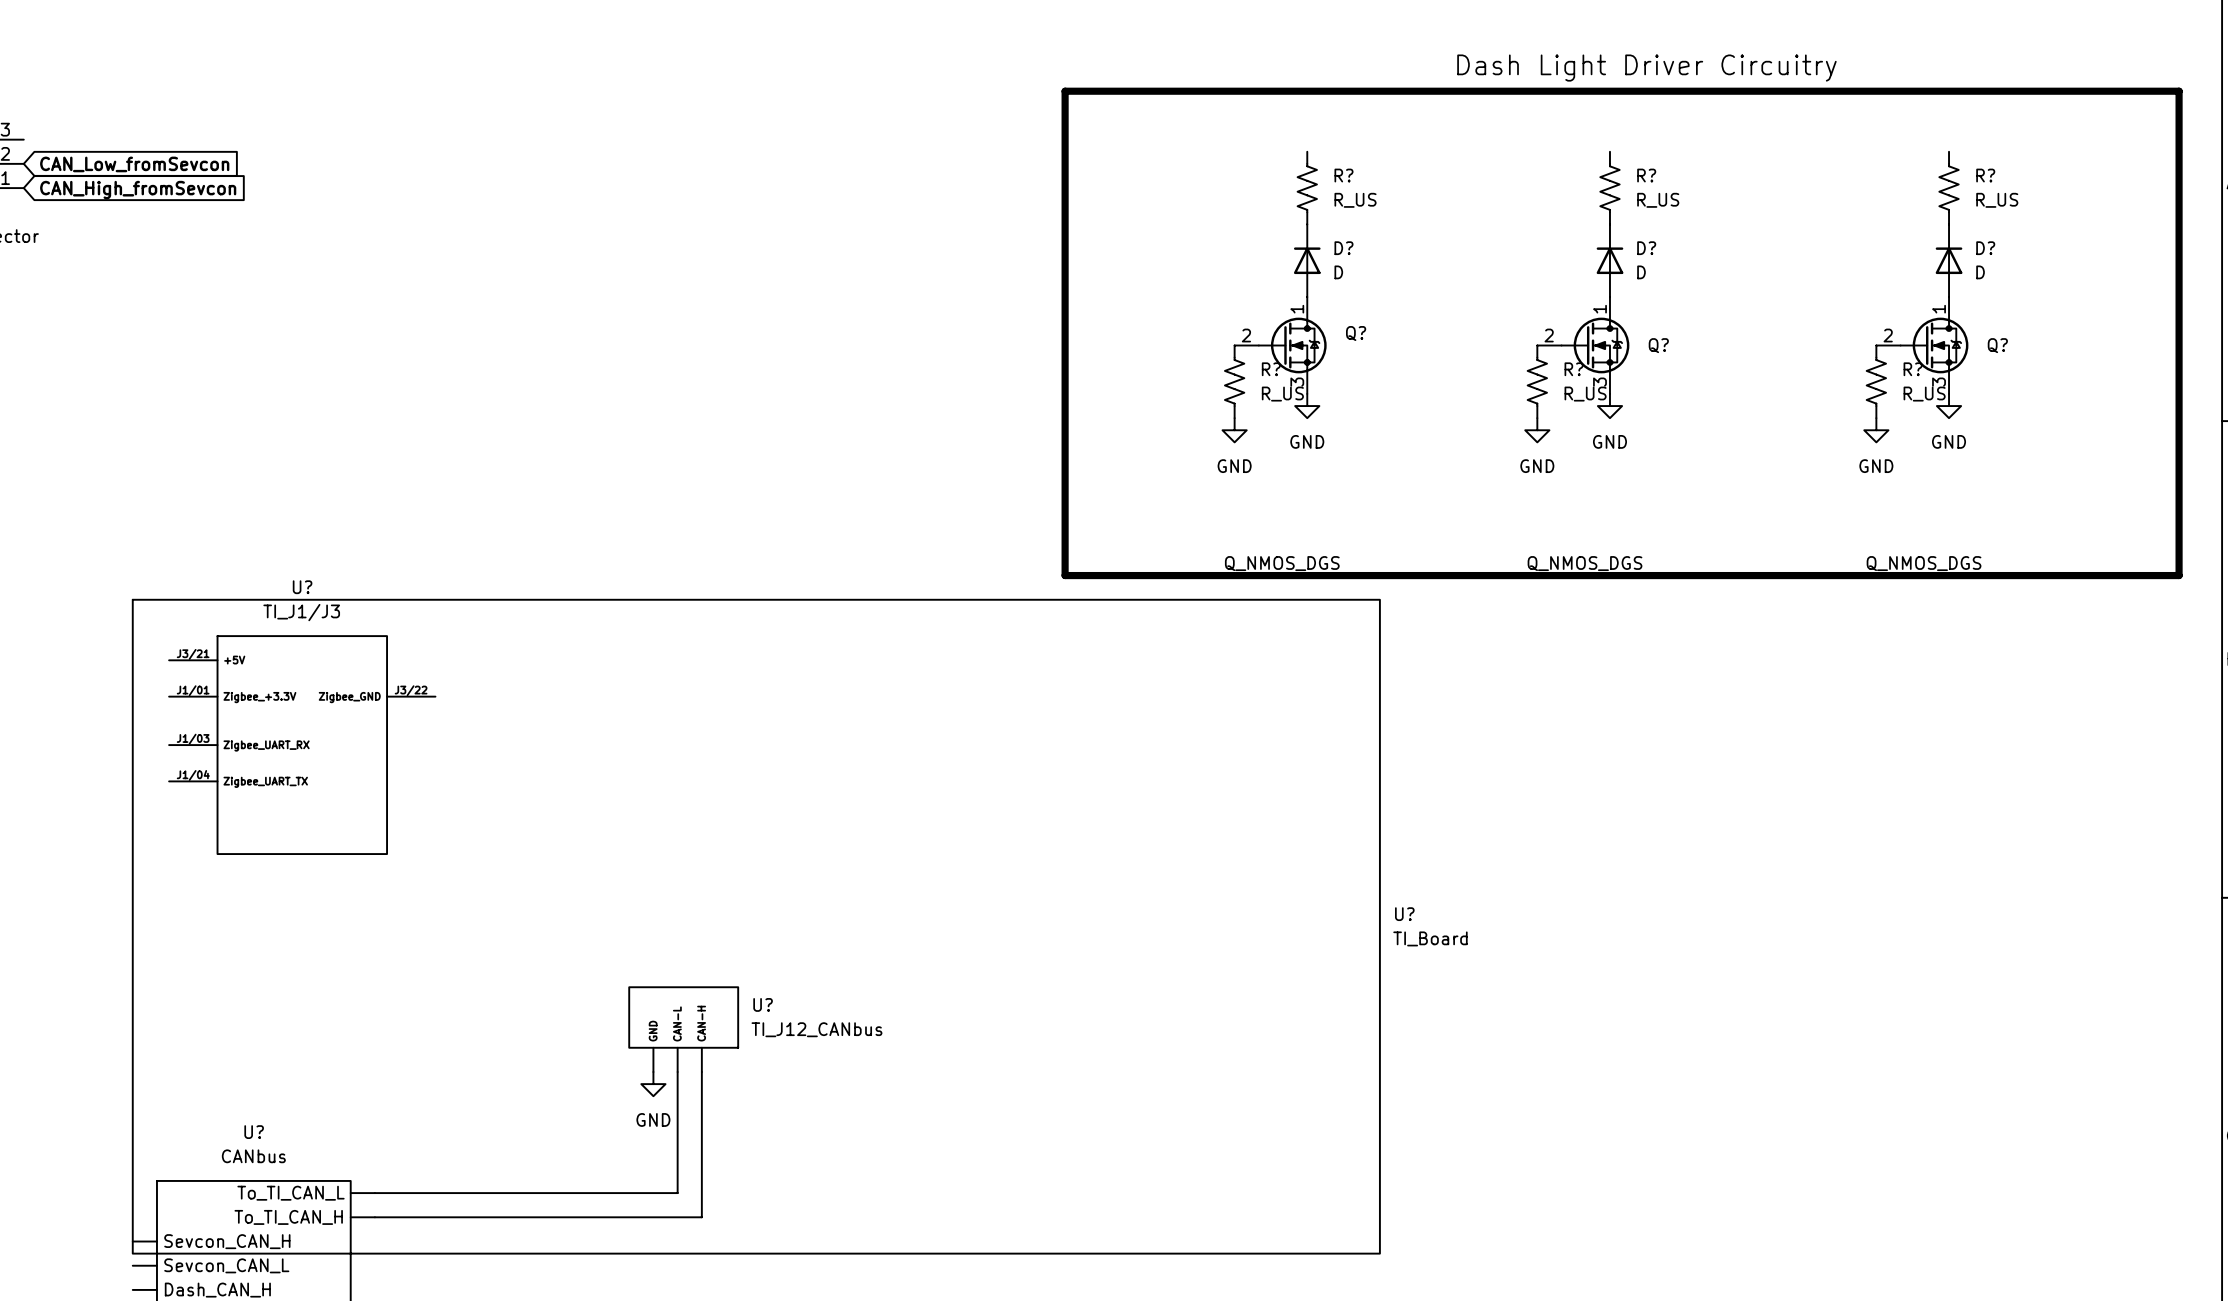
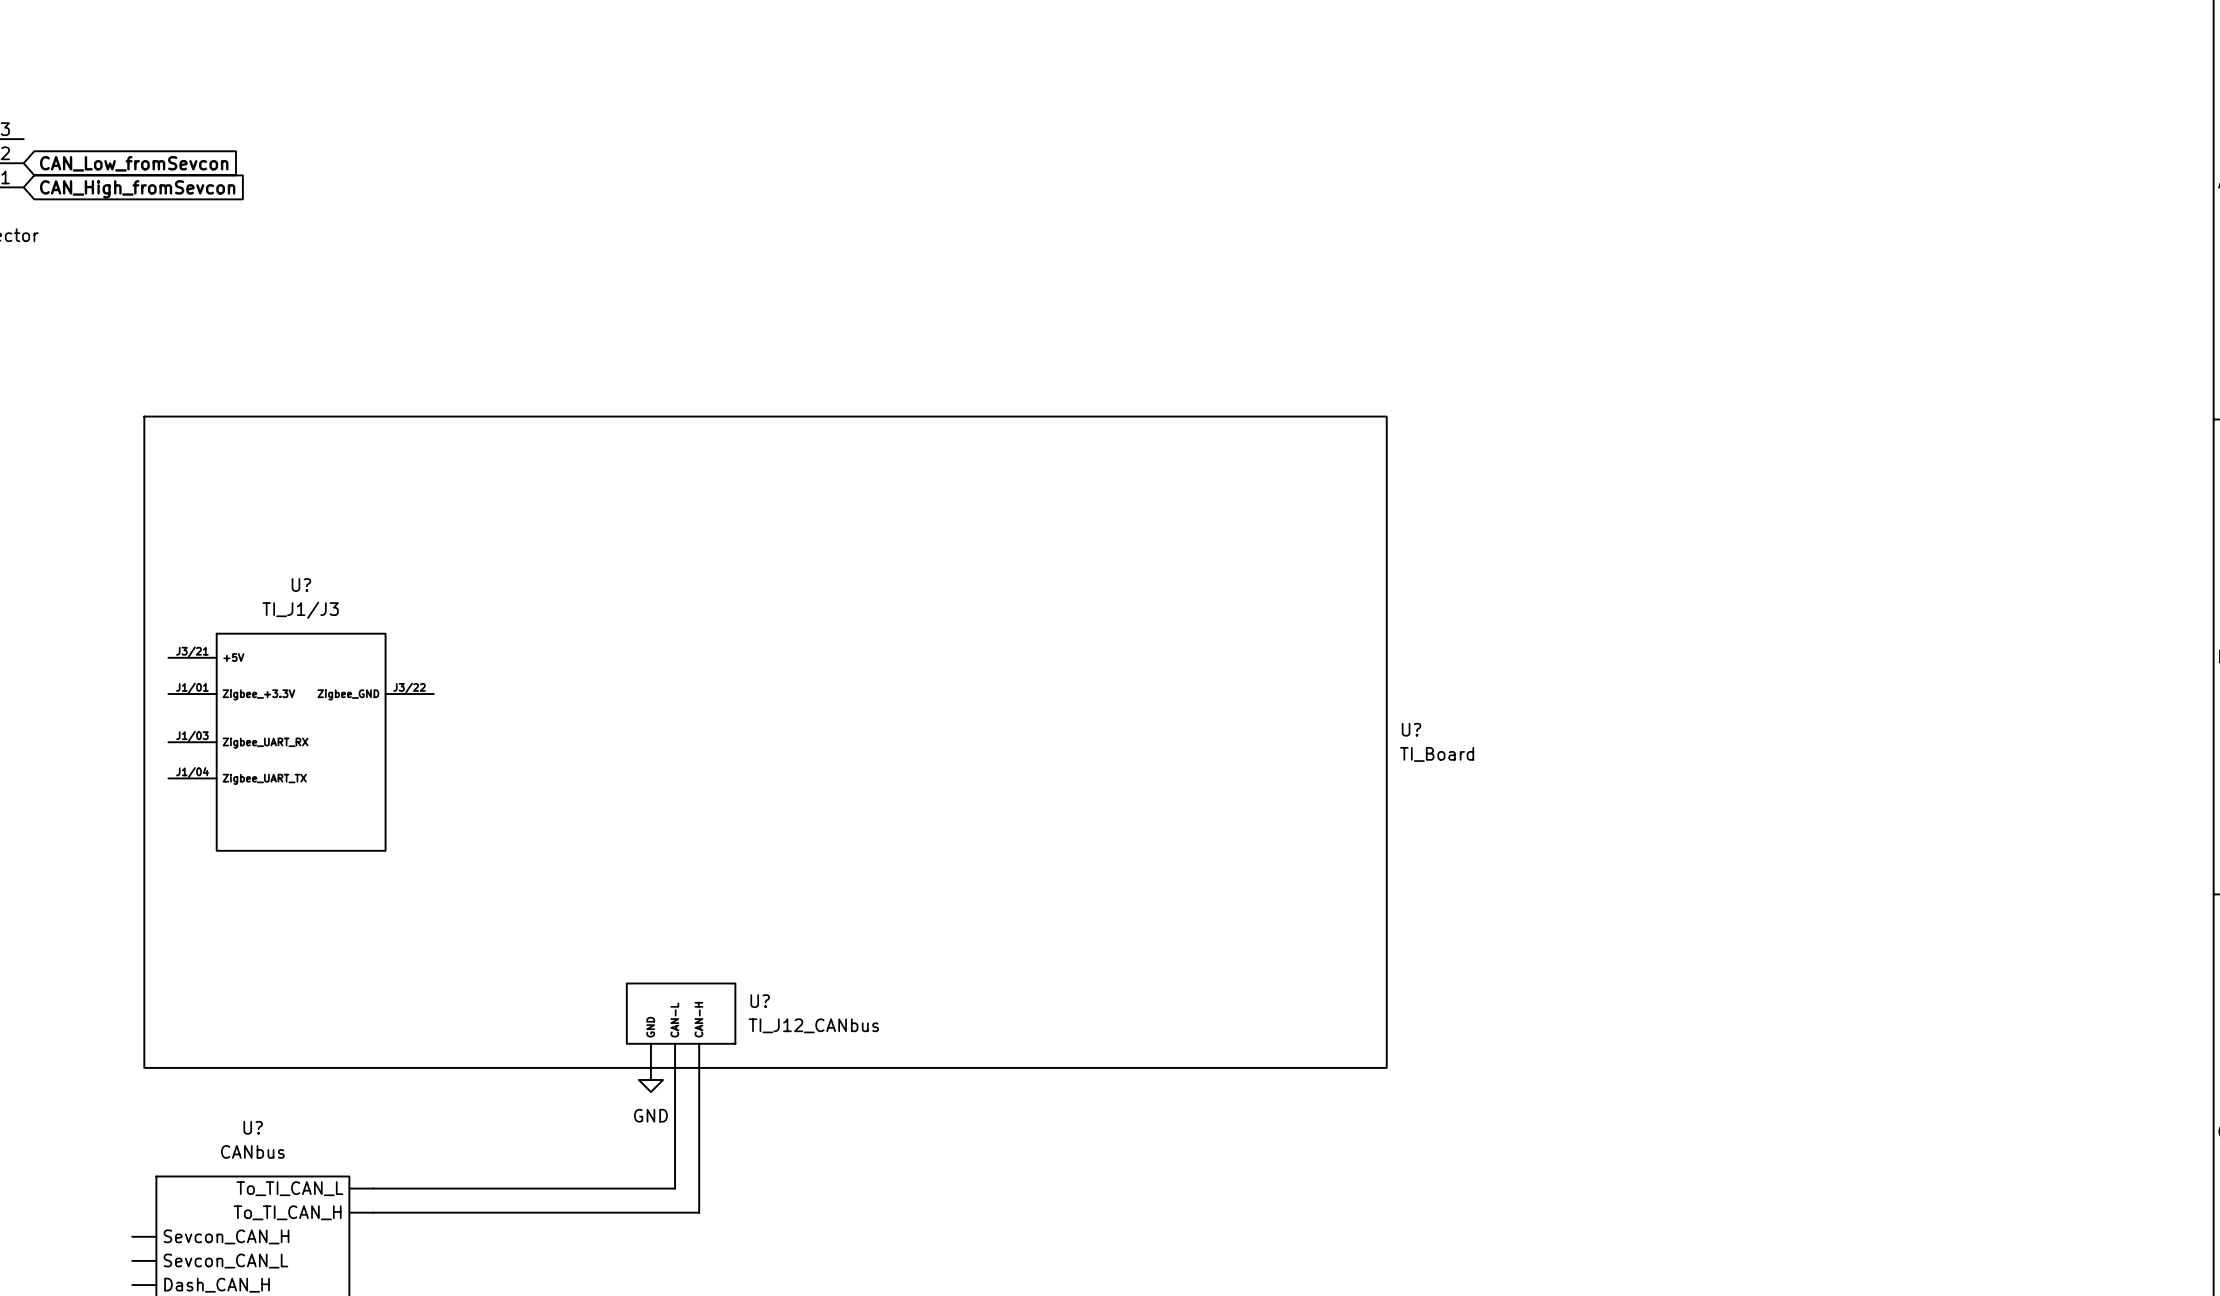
text: Dash Light Driver Circuitry (1646, 68) -> none
line: (1065, 91) (2179, 91) (2179, 575) (1065, 575) (1065, 91) -> none
R?: R_US (1307, 188) -> none
R?: R_US (1609, 188) -> none
R?: R_US (1949, 188) -> none
D?: D (1307, 260) -> none
D?: D (1609, 260) -> none
D?: D (1949, 260) -> none
Q?: Q_NMOS_DGS (1280, 345) -> none
Q?: Q_NMOS_DGS (1583, 345) -> none
Q?: Q_NMOS_DGS (1922, 345) -> none
R?: R_US (1234, 381) -> none
R?: R_US (1537, 381) -> none
R?: R_US (1876, 381) -> none
power symbol: GND (1307, 406) -> none
power symbol: GND (1609, 406) -> none
power symbol: GND (1949, 406) -> none
power symbol: GND (1234, 430) -> none
power symbol: GND (1537, 430) -> none
power symbol: GND (1876, 430) -> none
U? position: (756, 926) -> (765, 742)

